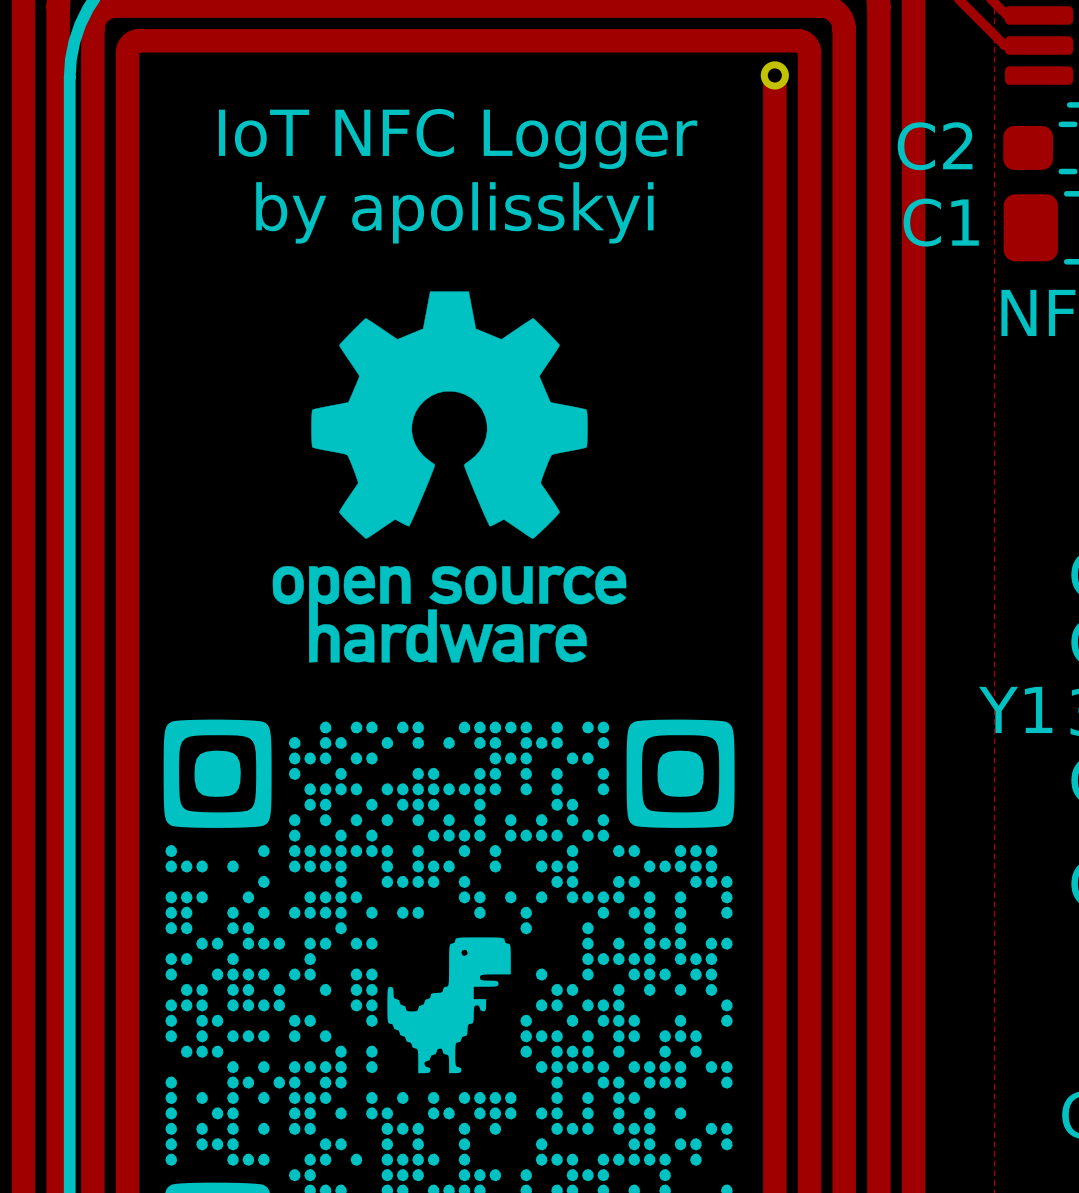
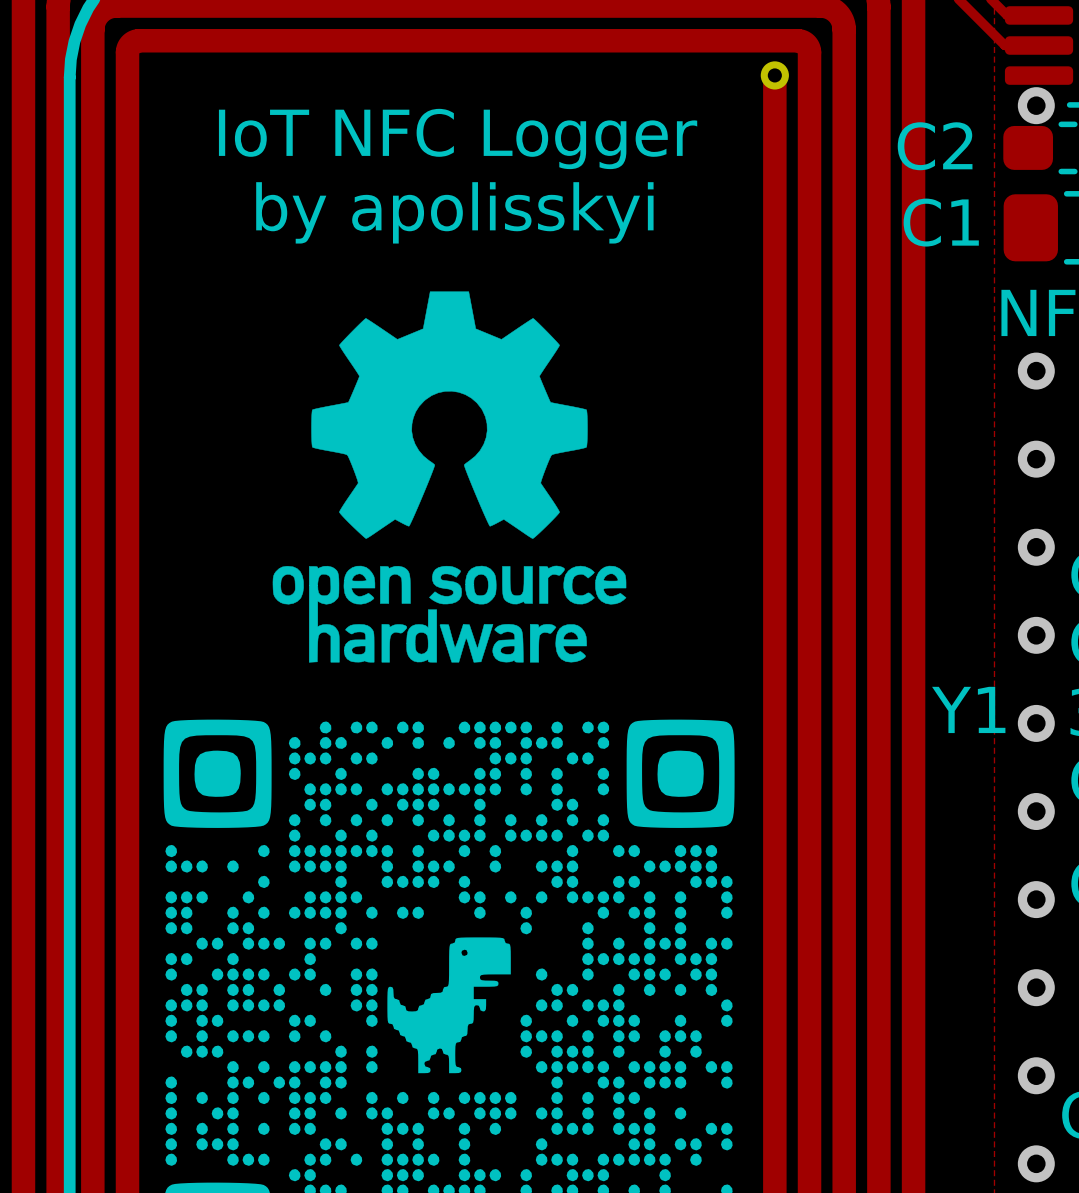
via: none -> (1036, 105)
via: none -> (1036, 371)
via: none -> (1036, 459)
via: none -> (1036, 547)
via: none -> (1036, 635)
Y1 name position: Y1 (1015, 709) -> Y1 (968, 709)
via: none -> (1036, 723)
via: none -> (1036, 811)
via: none -> (1036, 899)
via: none -> (1036, 987)
via: none -> (1036, 1075)
via: none -> (1036, 1163)

